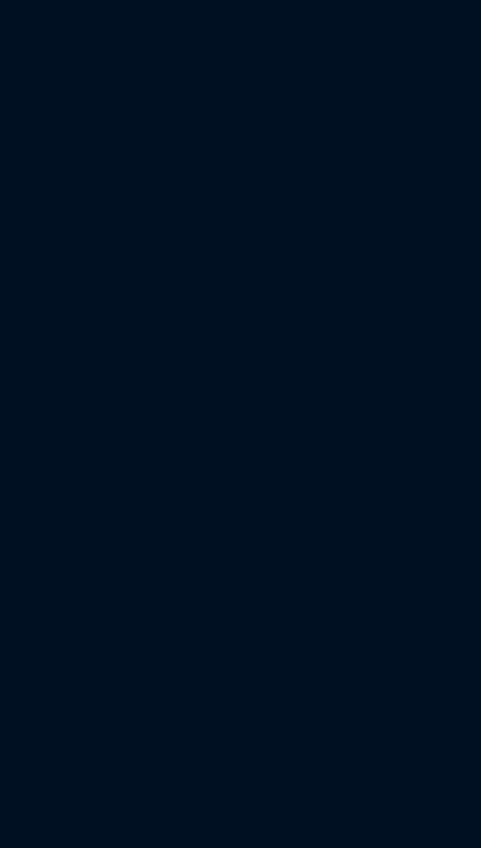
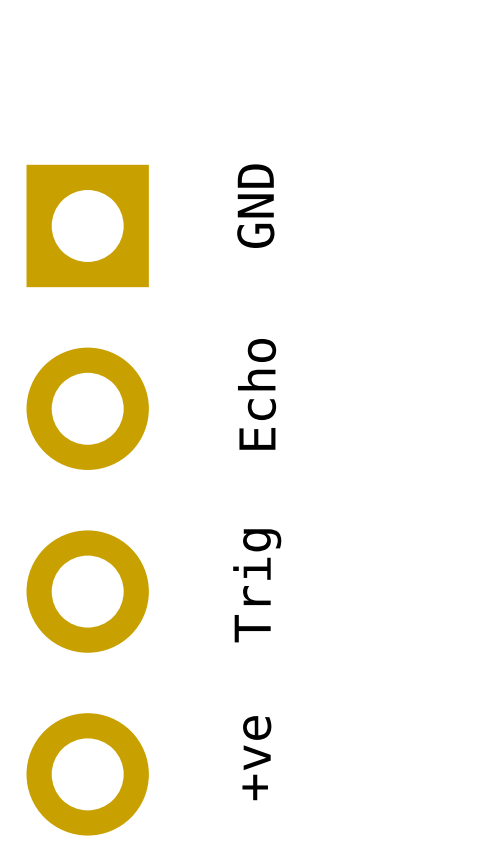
text: none -> GND (255, 206)
text: none -> Echo (257, 394)
part: none -> (87, 500)
text: none -> Trig (257, 585)
text: none -> +ve (256, 758)

